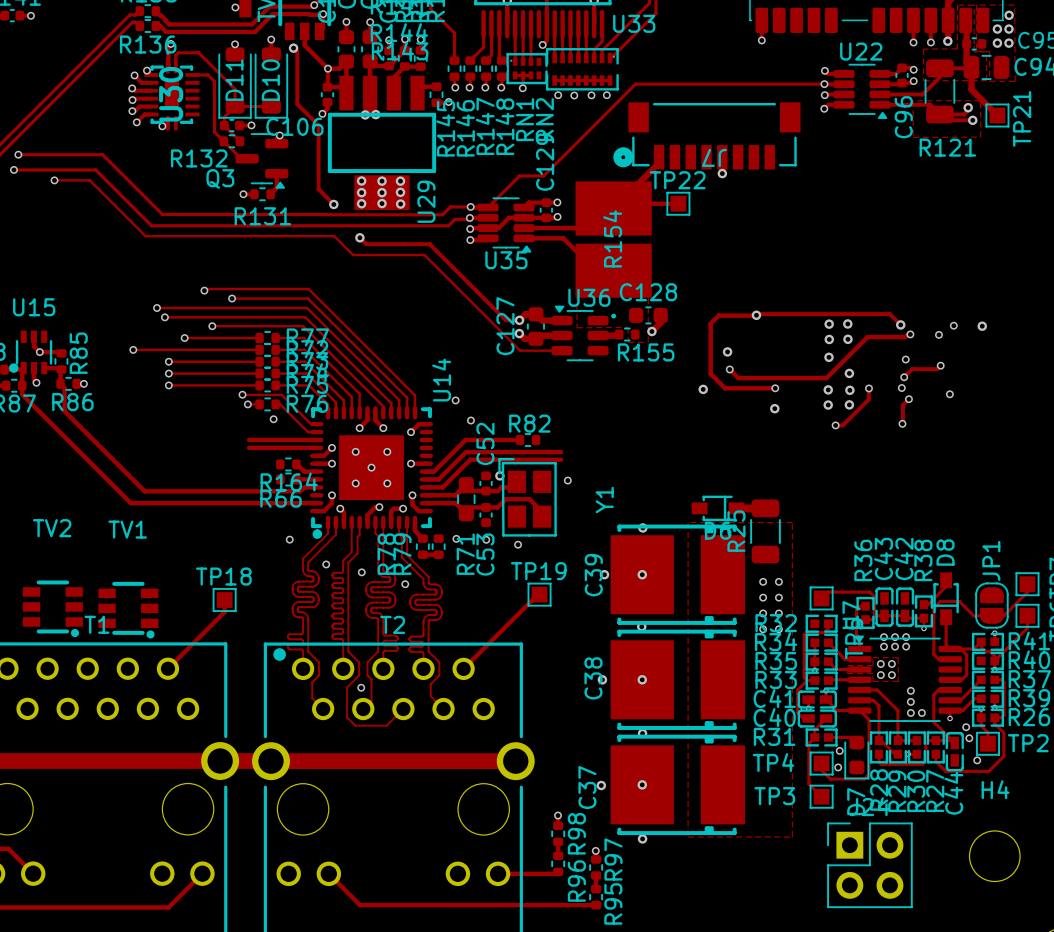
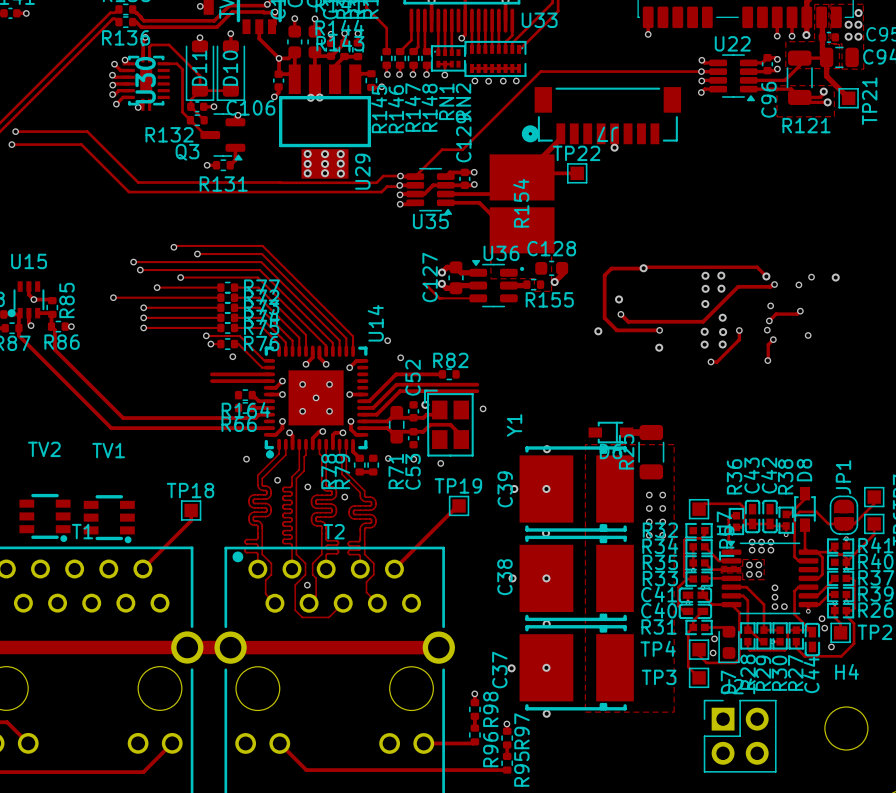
track: (293, 48) (297, 51) (297, 104) (318, 125) (318, 189) (333, 204) -> none
via: (293, 48) -> none
track: (54, 180) (89, 179) (145, 236) (334, 236) (353, 255) (424, 255) (520, 350) -> (424, 283) (439, 298) (442, 298)
via: (54, 180) -> none
via: (333, 204) -> none
track: (359, 237) (366, 244) (429, 244) (505, 320) (519, 320) -> none
via: (359, 237) -> none

